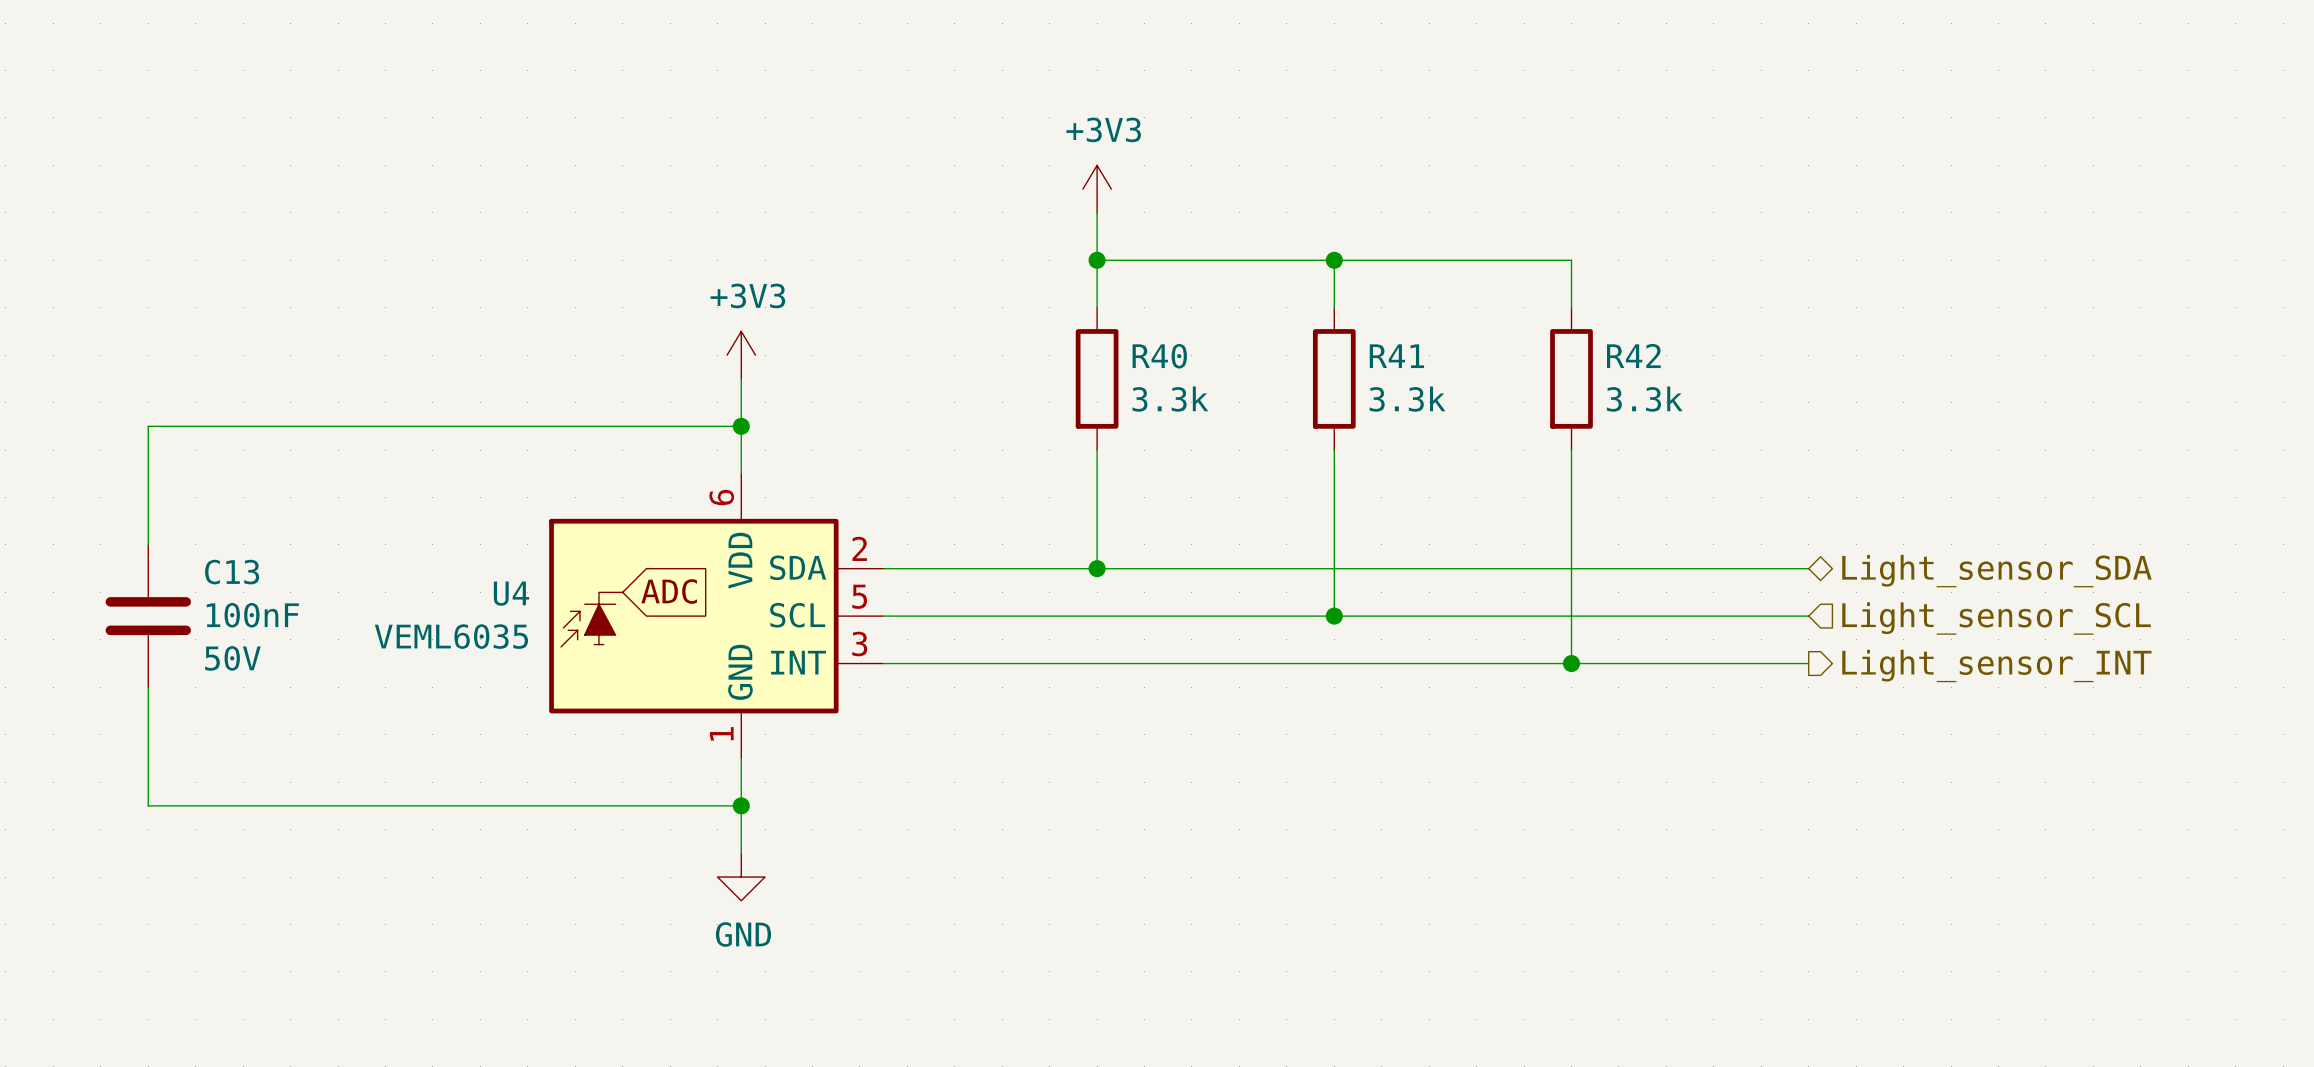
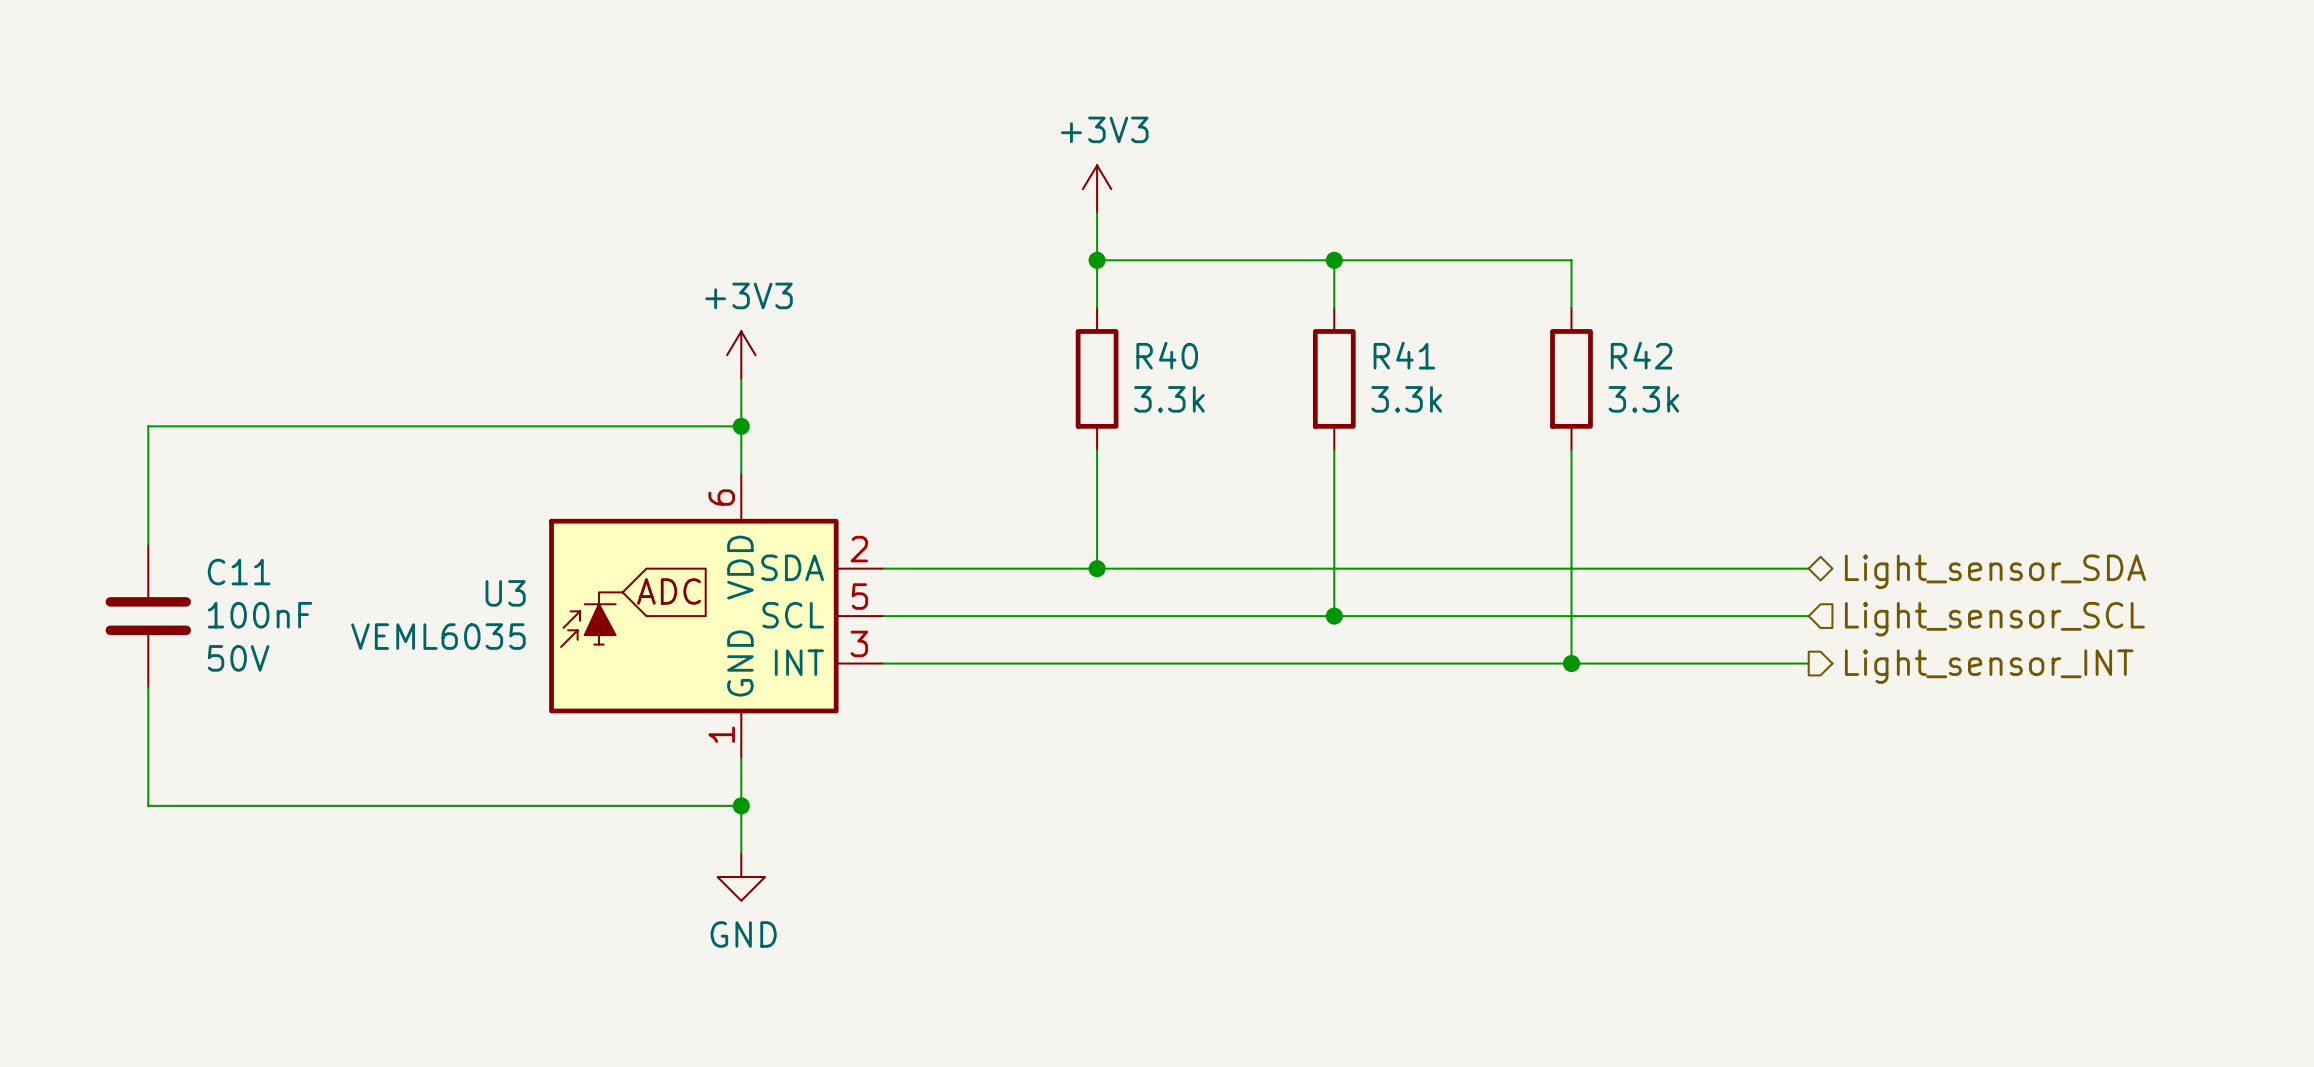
C13 name: C13 (232, 572) -> C11 (239, 572)
U4 name: U4 (511, 593) -> U3 (505, 593)

